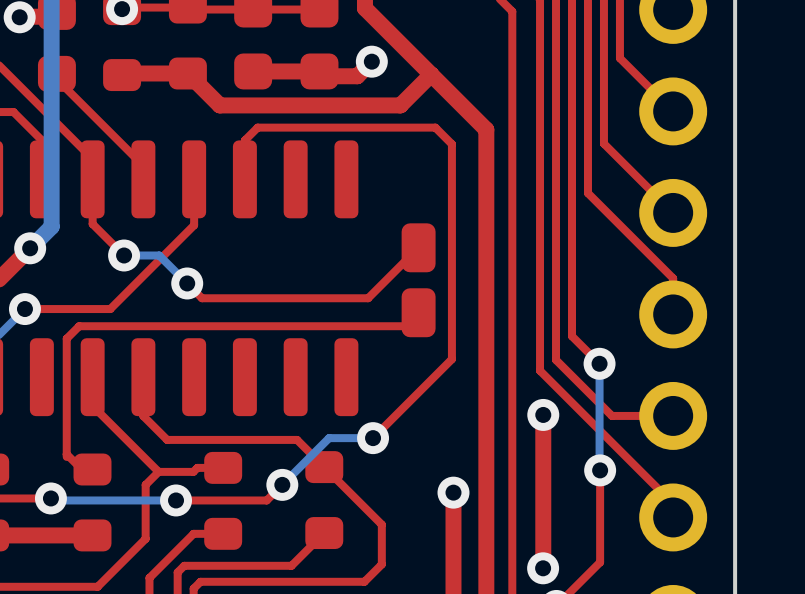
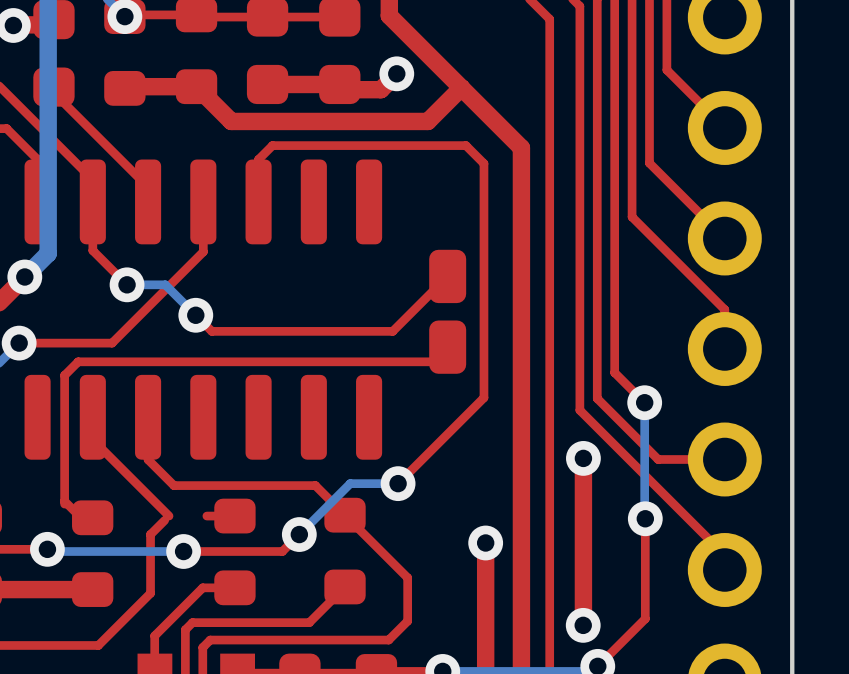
top track: (92, 397) (92, 405) (158, 471) (193, 471) (197, 467) -> (92, 439) (169, 516)

